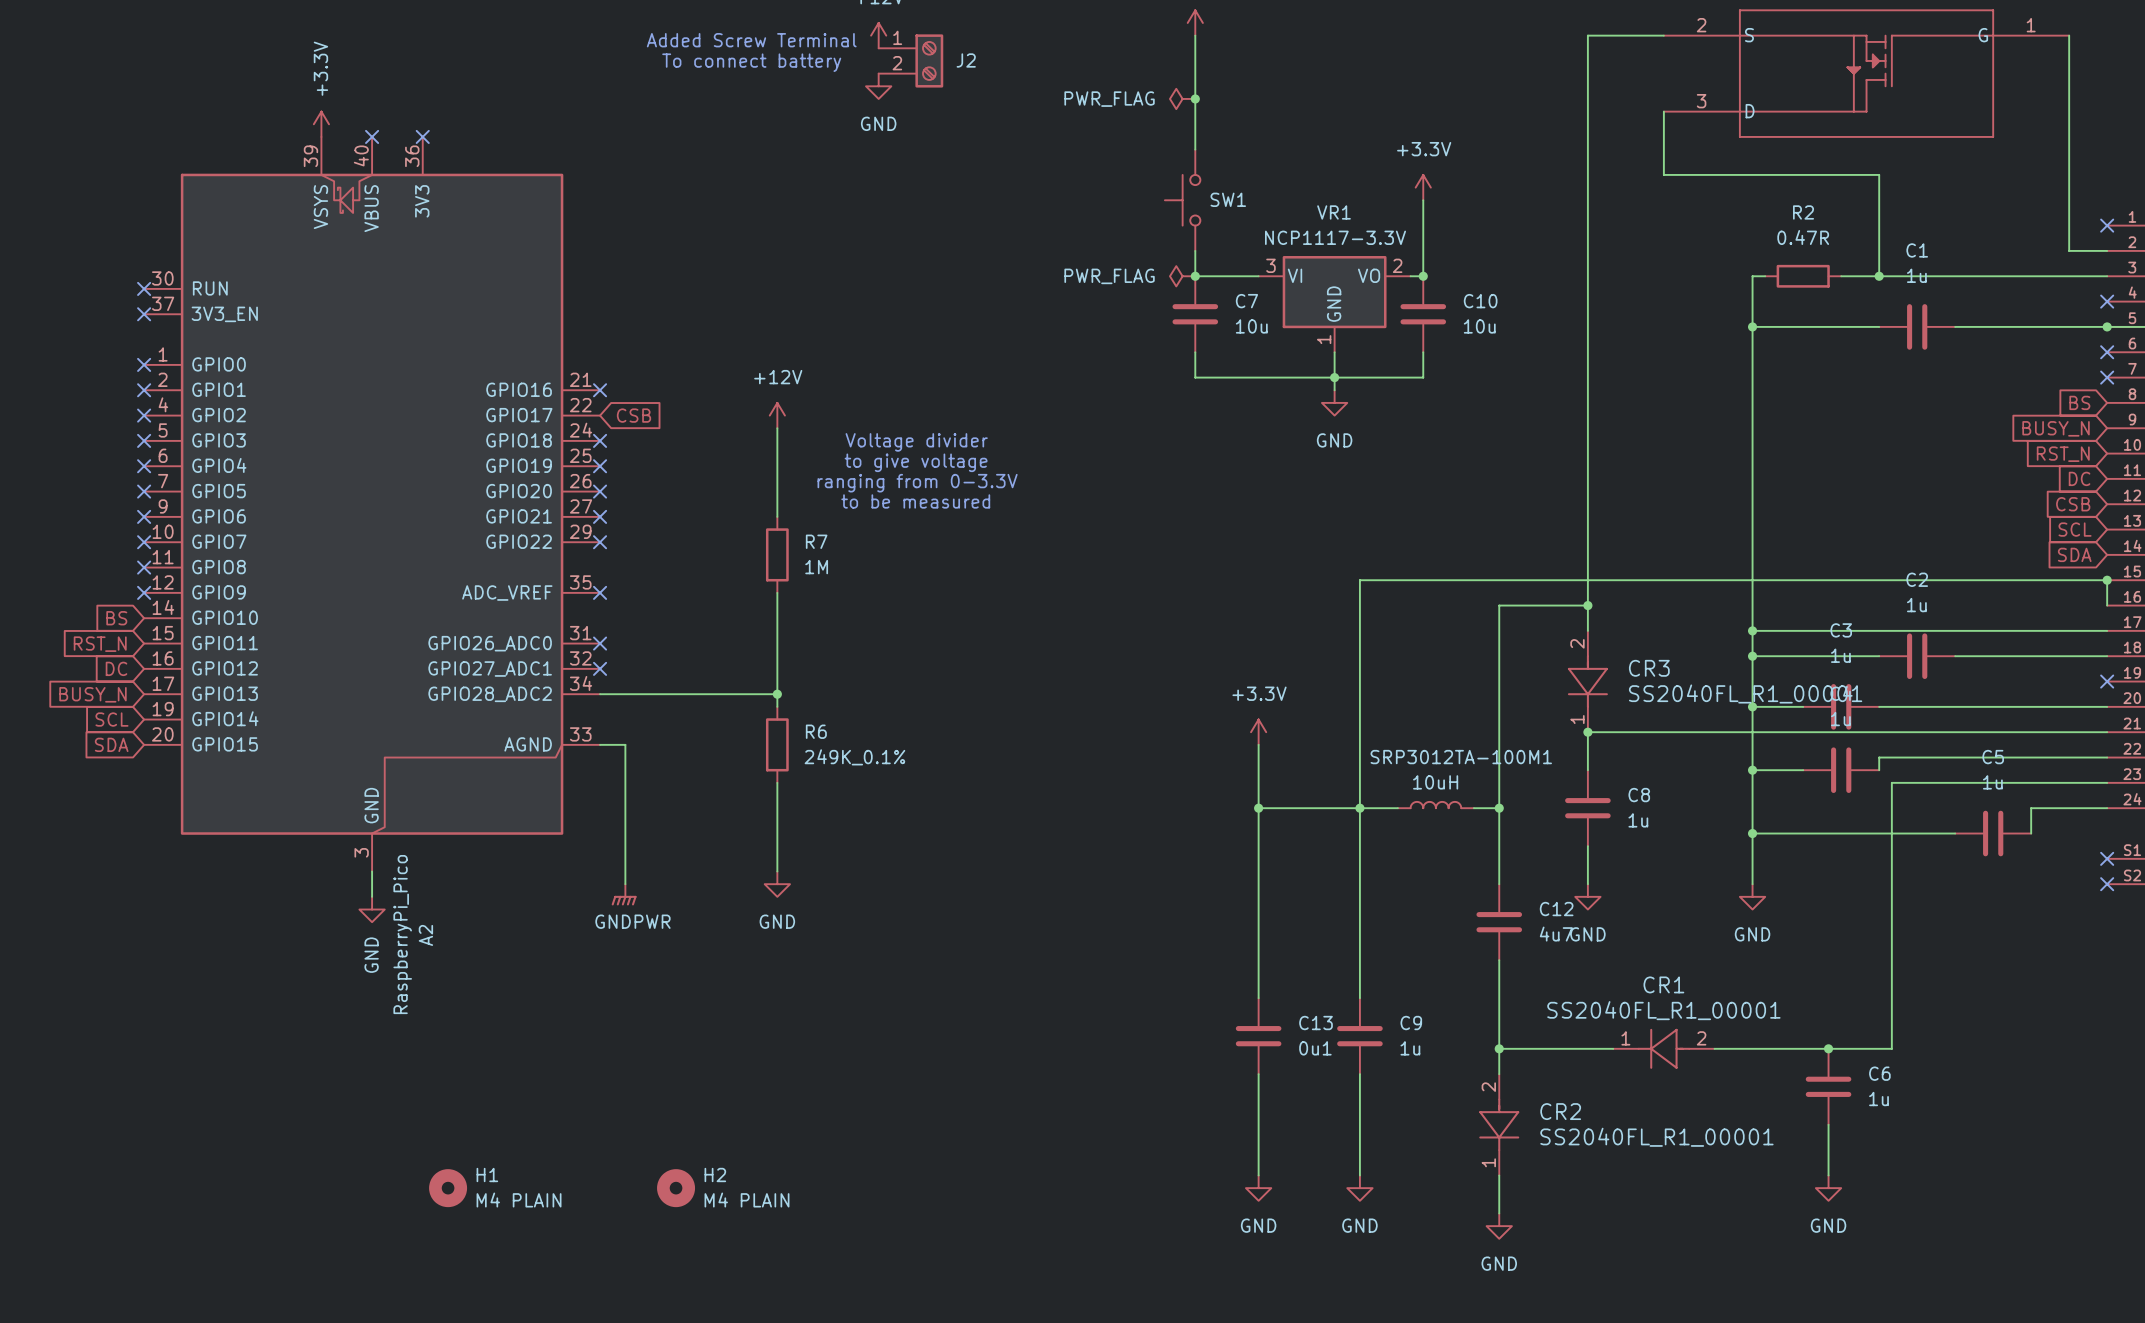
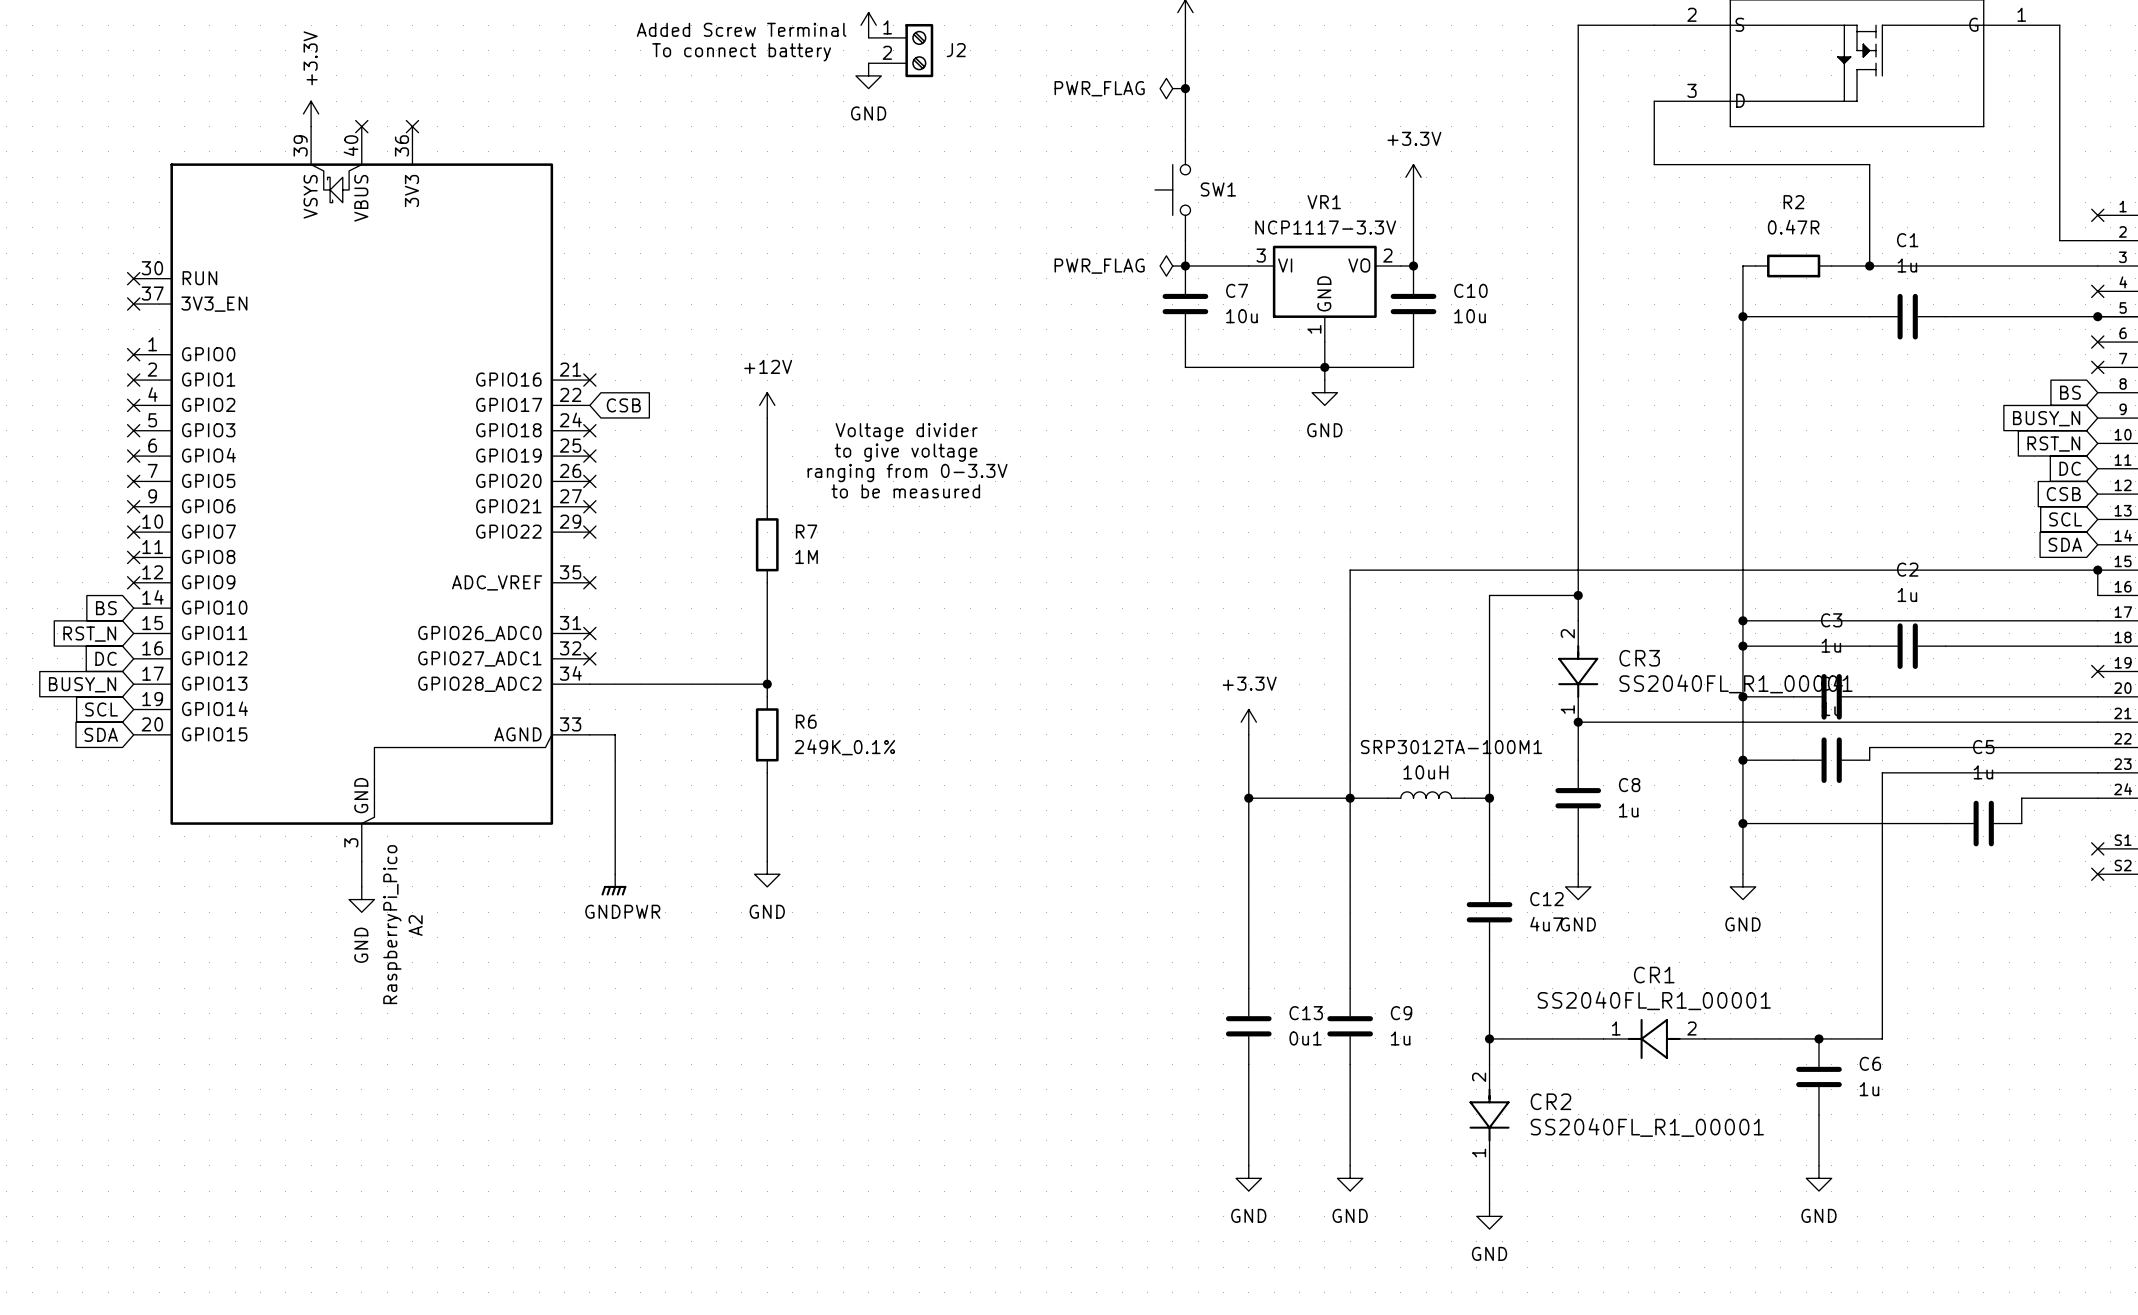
H1: M4 PLAIN (448, 1188) -> none
H2: M4 PLAIN (676, 1188) -> none

